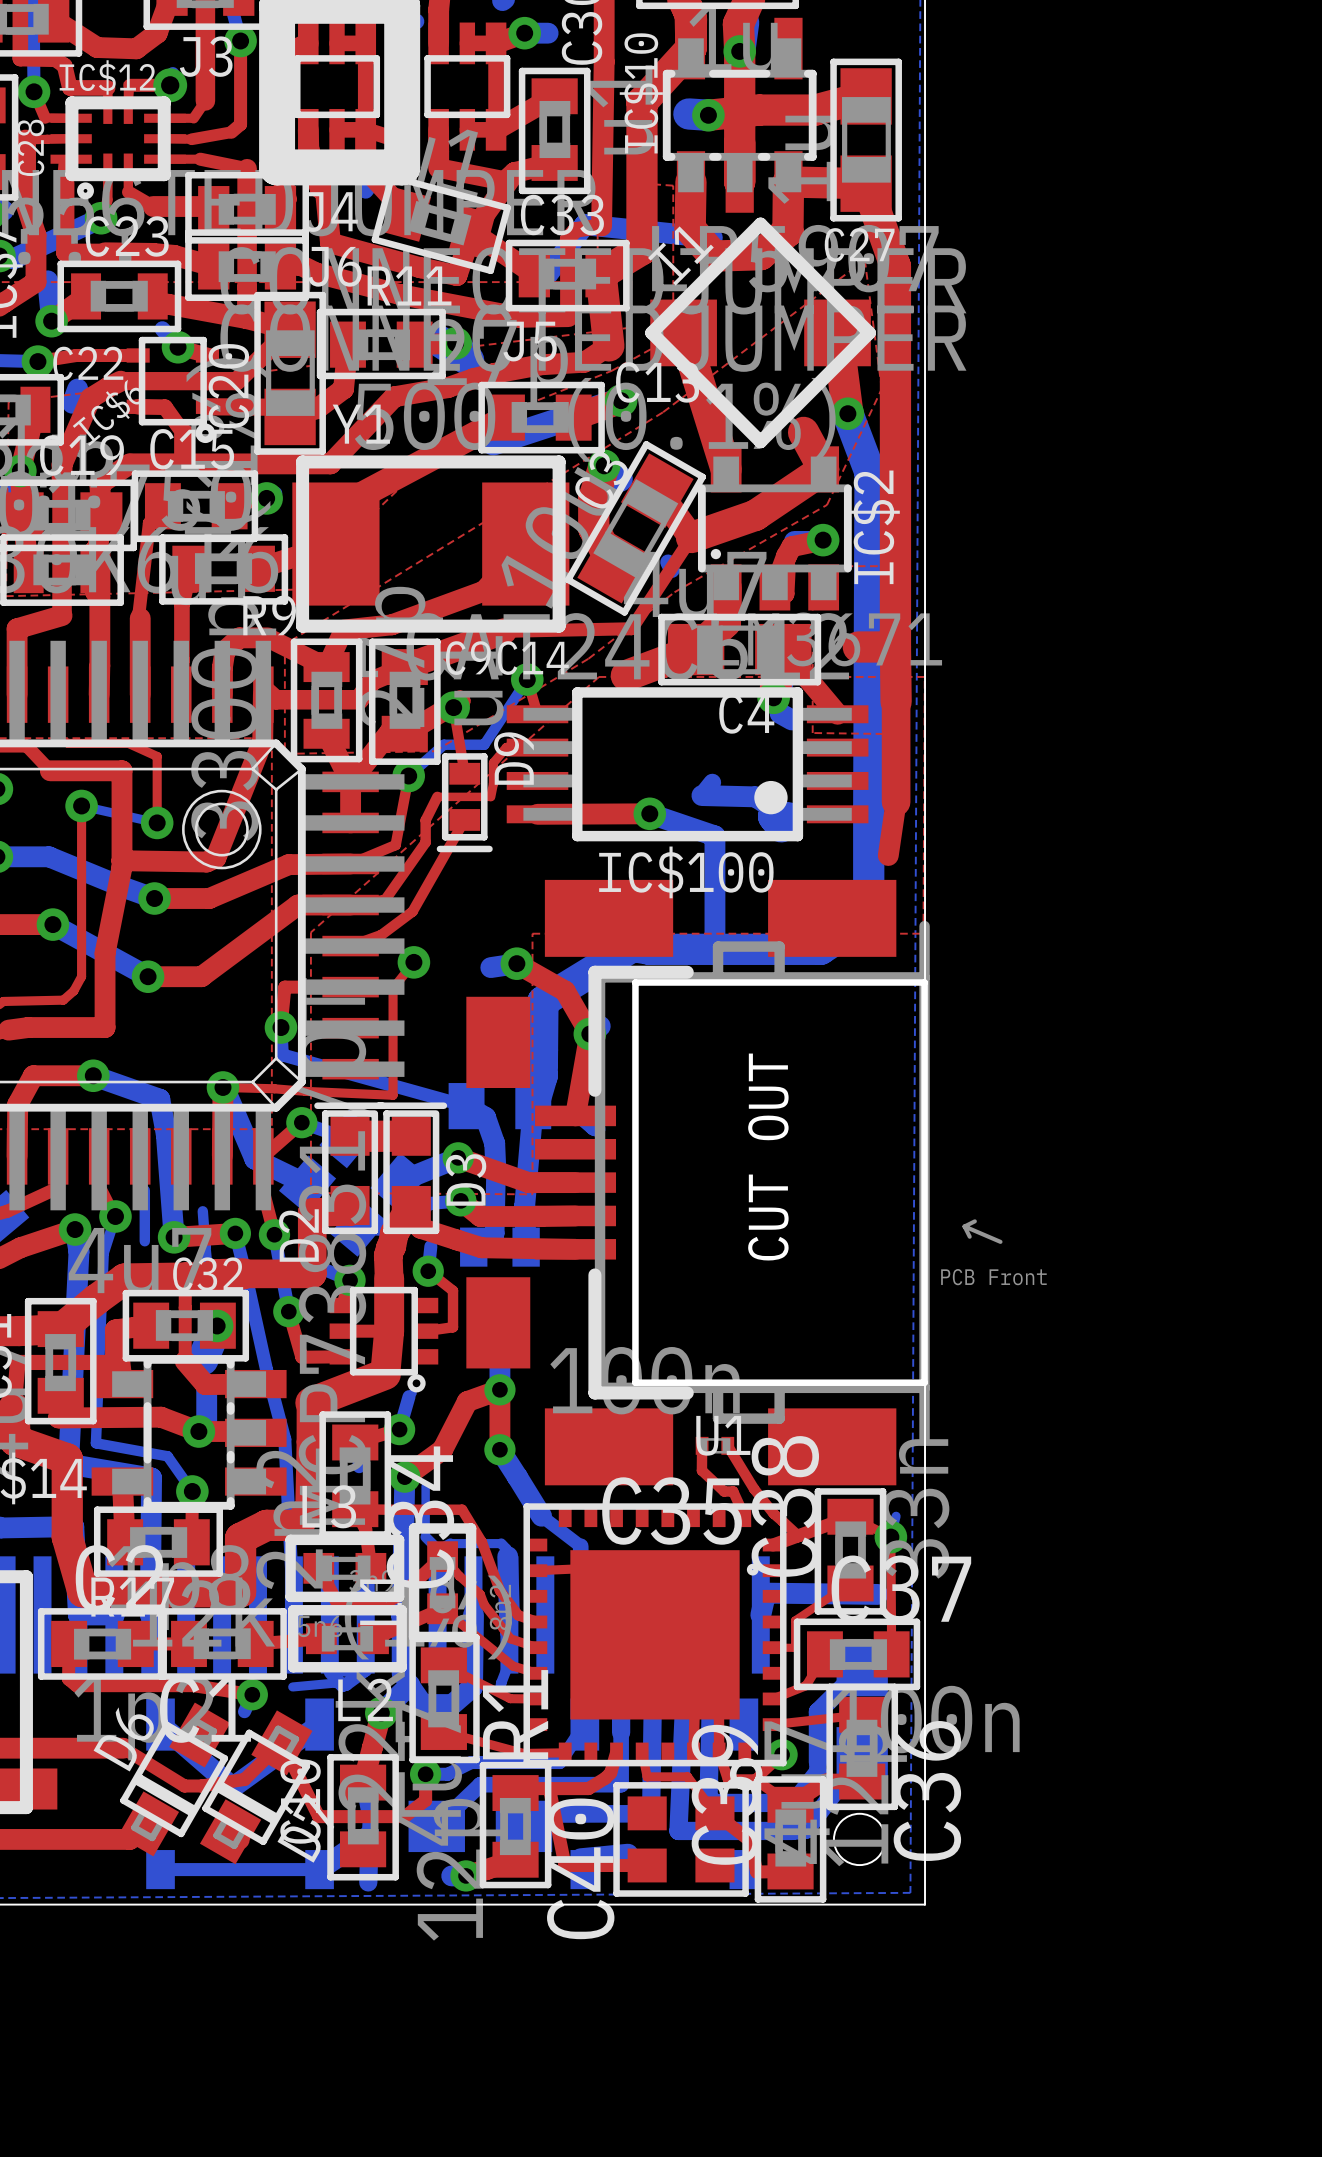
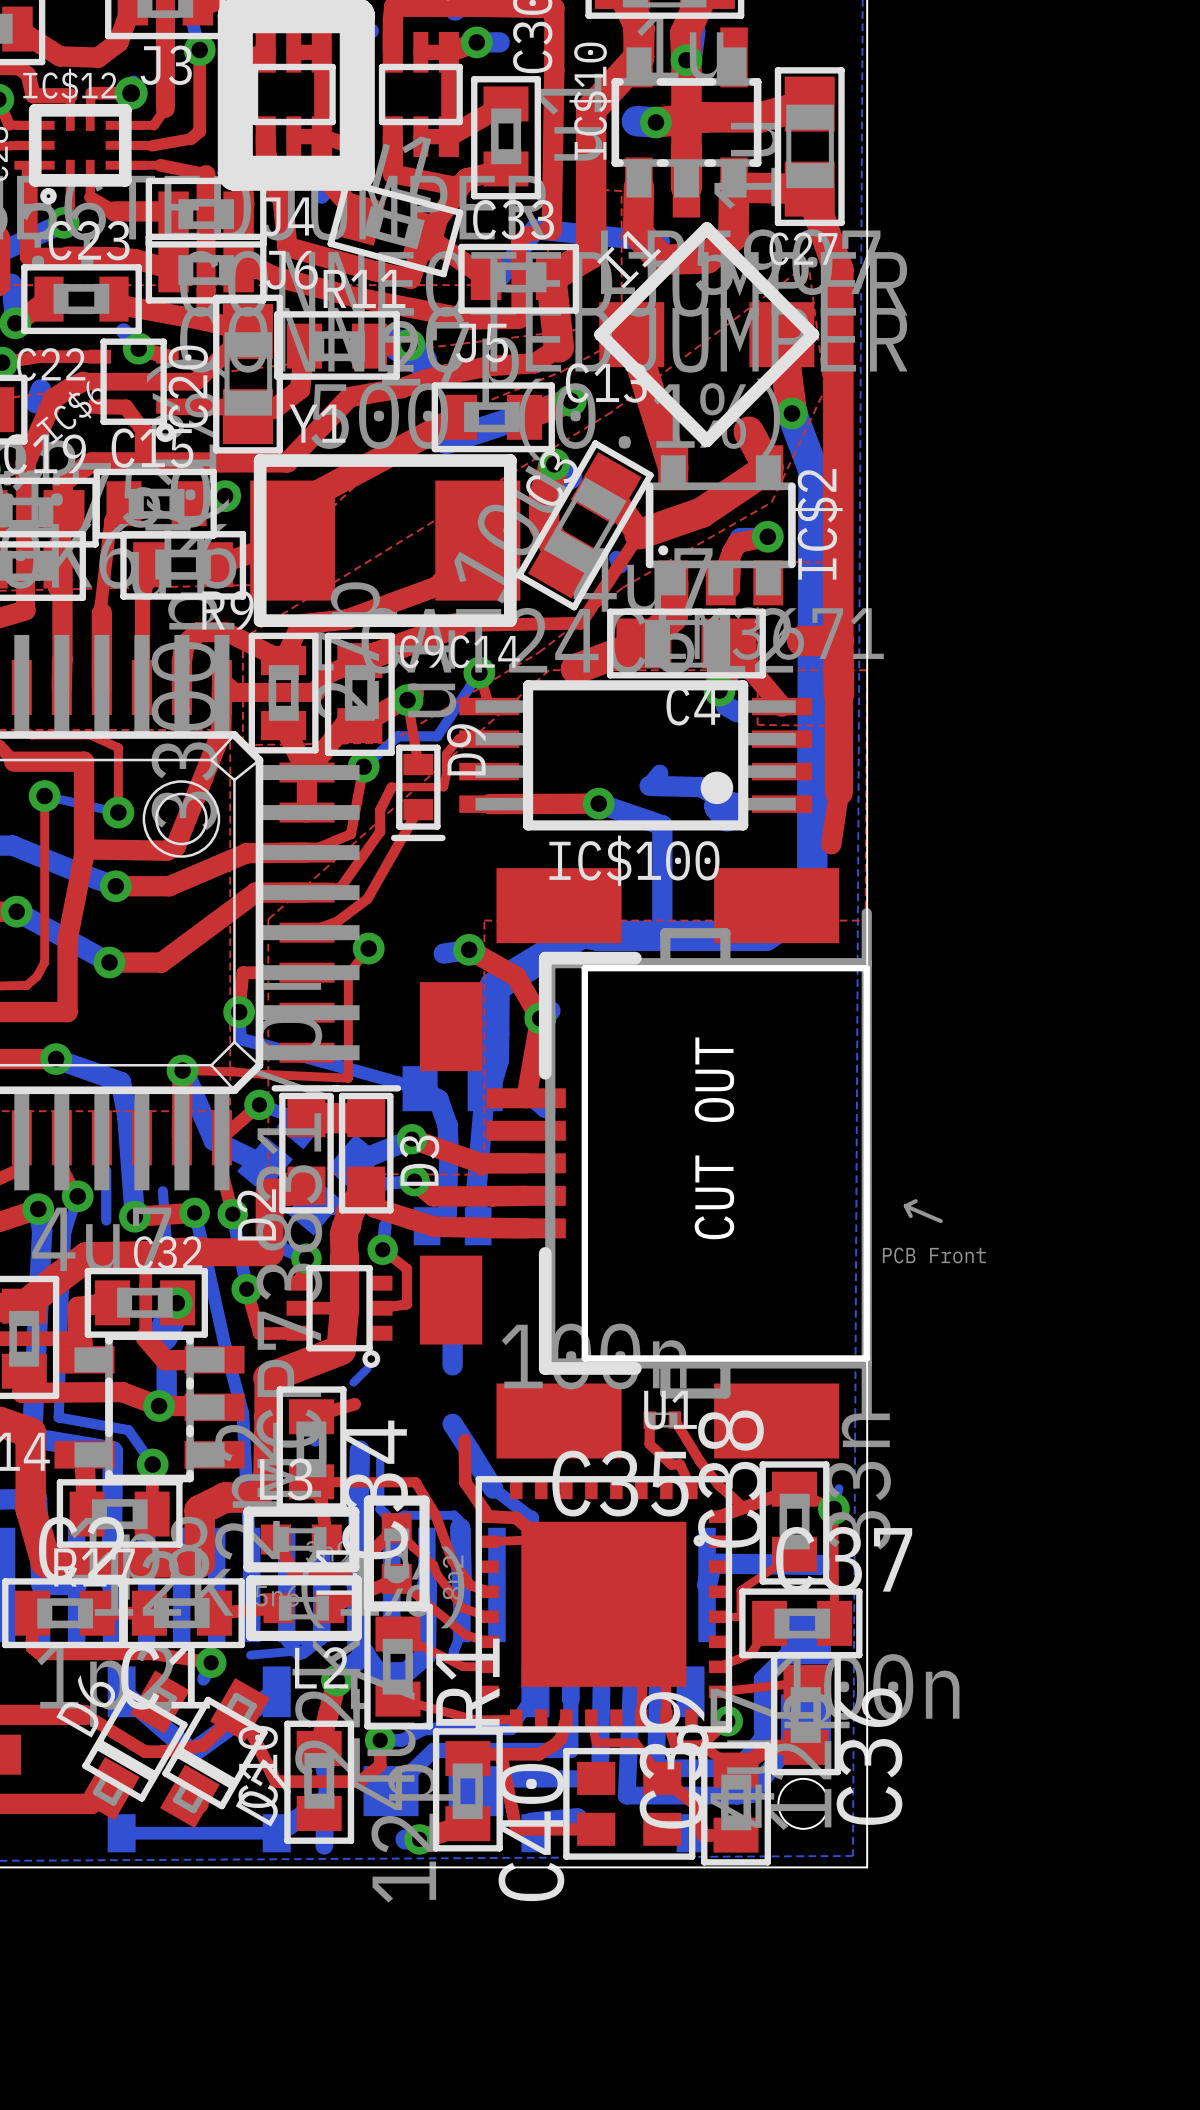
via: (499, 1389) -> none
bottom track: (409, 1396) (399, 1429) -> (363, 1372) (353, 1382)
via: (399, 1429) -> none
top track: (499, 1449) (499, 1389) (467, 1401) (442, 1449) (404, 1477) -> none
via: (499, 1449) -> none
top track: none -> (464, 1440) (465, 1482) (488, 1516)
via: (404, 1477) -> none
top track: none -> (488, 1516) (516, 1517) (540, 1539)

